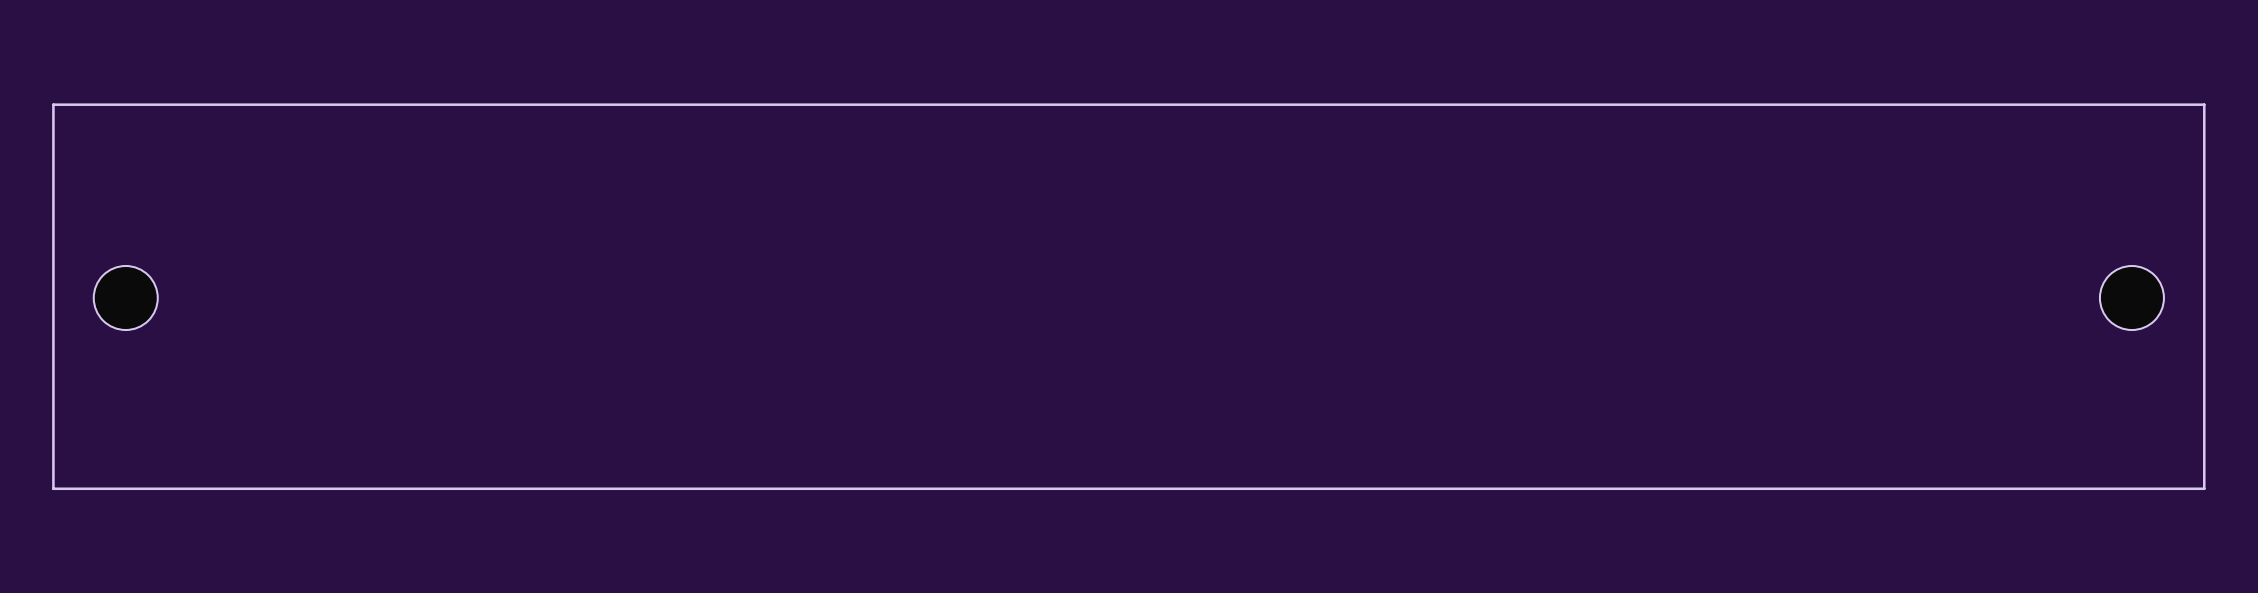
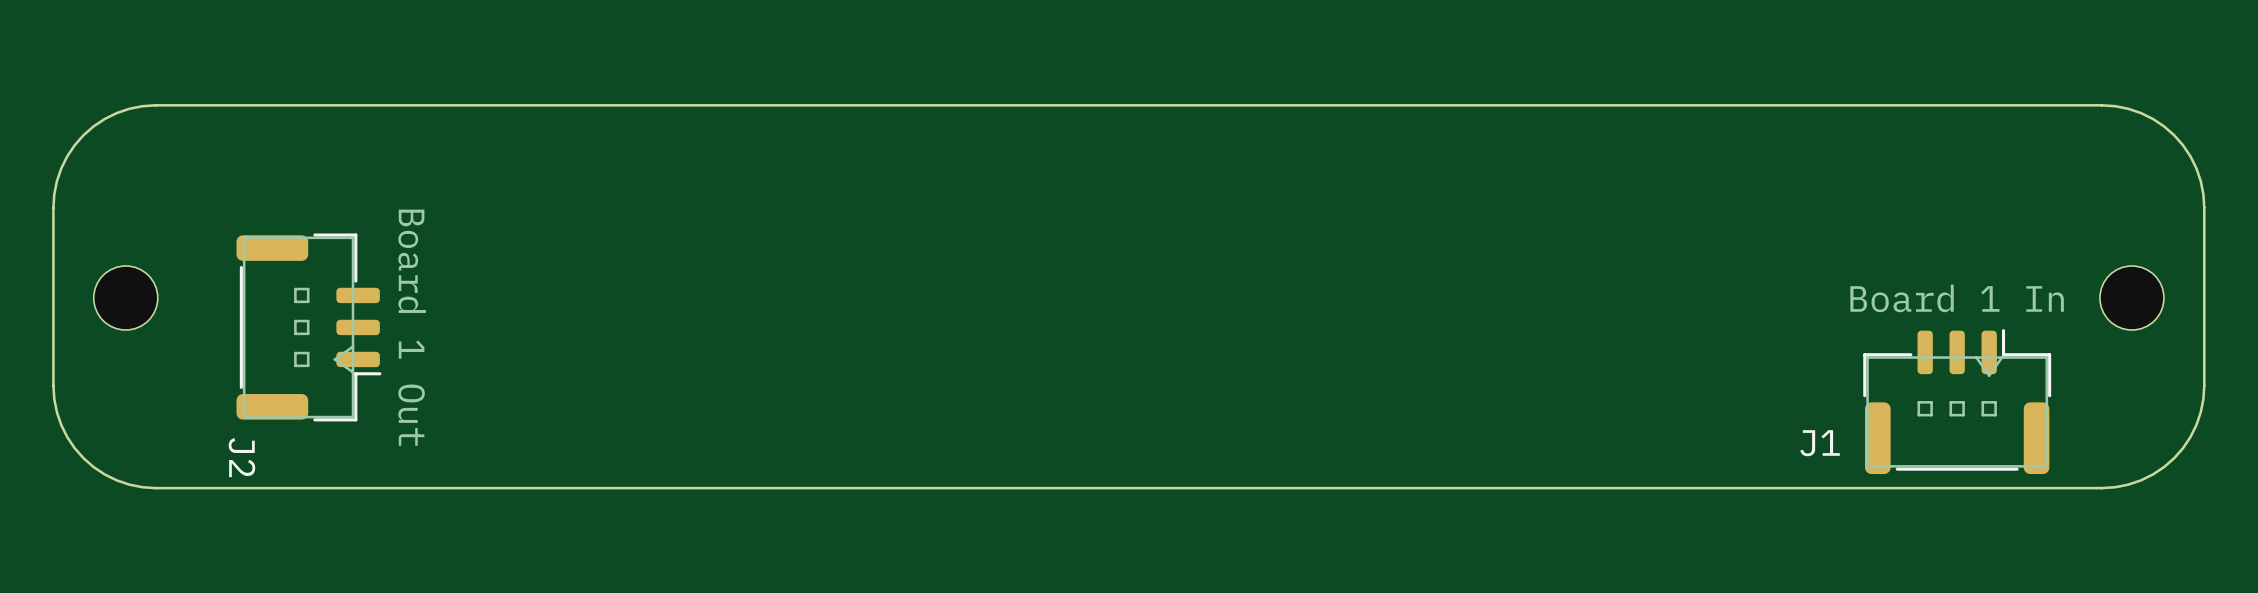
board edge: (2204, 207) (2204, 104) (53, 104) (53, 207) -> (2204, 207) (2200, 181) (2196, 168) (2183, 145) (2174, 135) (2153, 119) (2141, 113) (2128, 108) (2101, 105) (155, 105) (129, 108) (116, 113) (93, 126) (83, 135) (74, 145) (61, 168) (54, 194) (53, 207)
J2: none -> Board 1 Out (308, 327)
board edge: (2204, 385) (2204, 488) (53, 488) (53, 385) -> (2204, 385) (2203, 399) (2196, 424) (2183, 448) (2174, 458) (2164, 466) (2141, 480) (2128, 484) (2101, 488) (155, 488) (142, 487) (116, 480) (104, 474) (83, 458) (74, 448) (61, 424) (54, 399) (53, 385)
J1: none -> Board 1 In (1957, 401)

